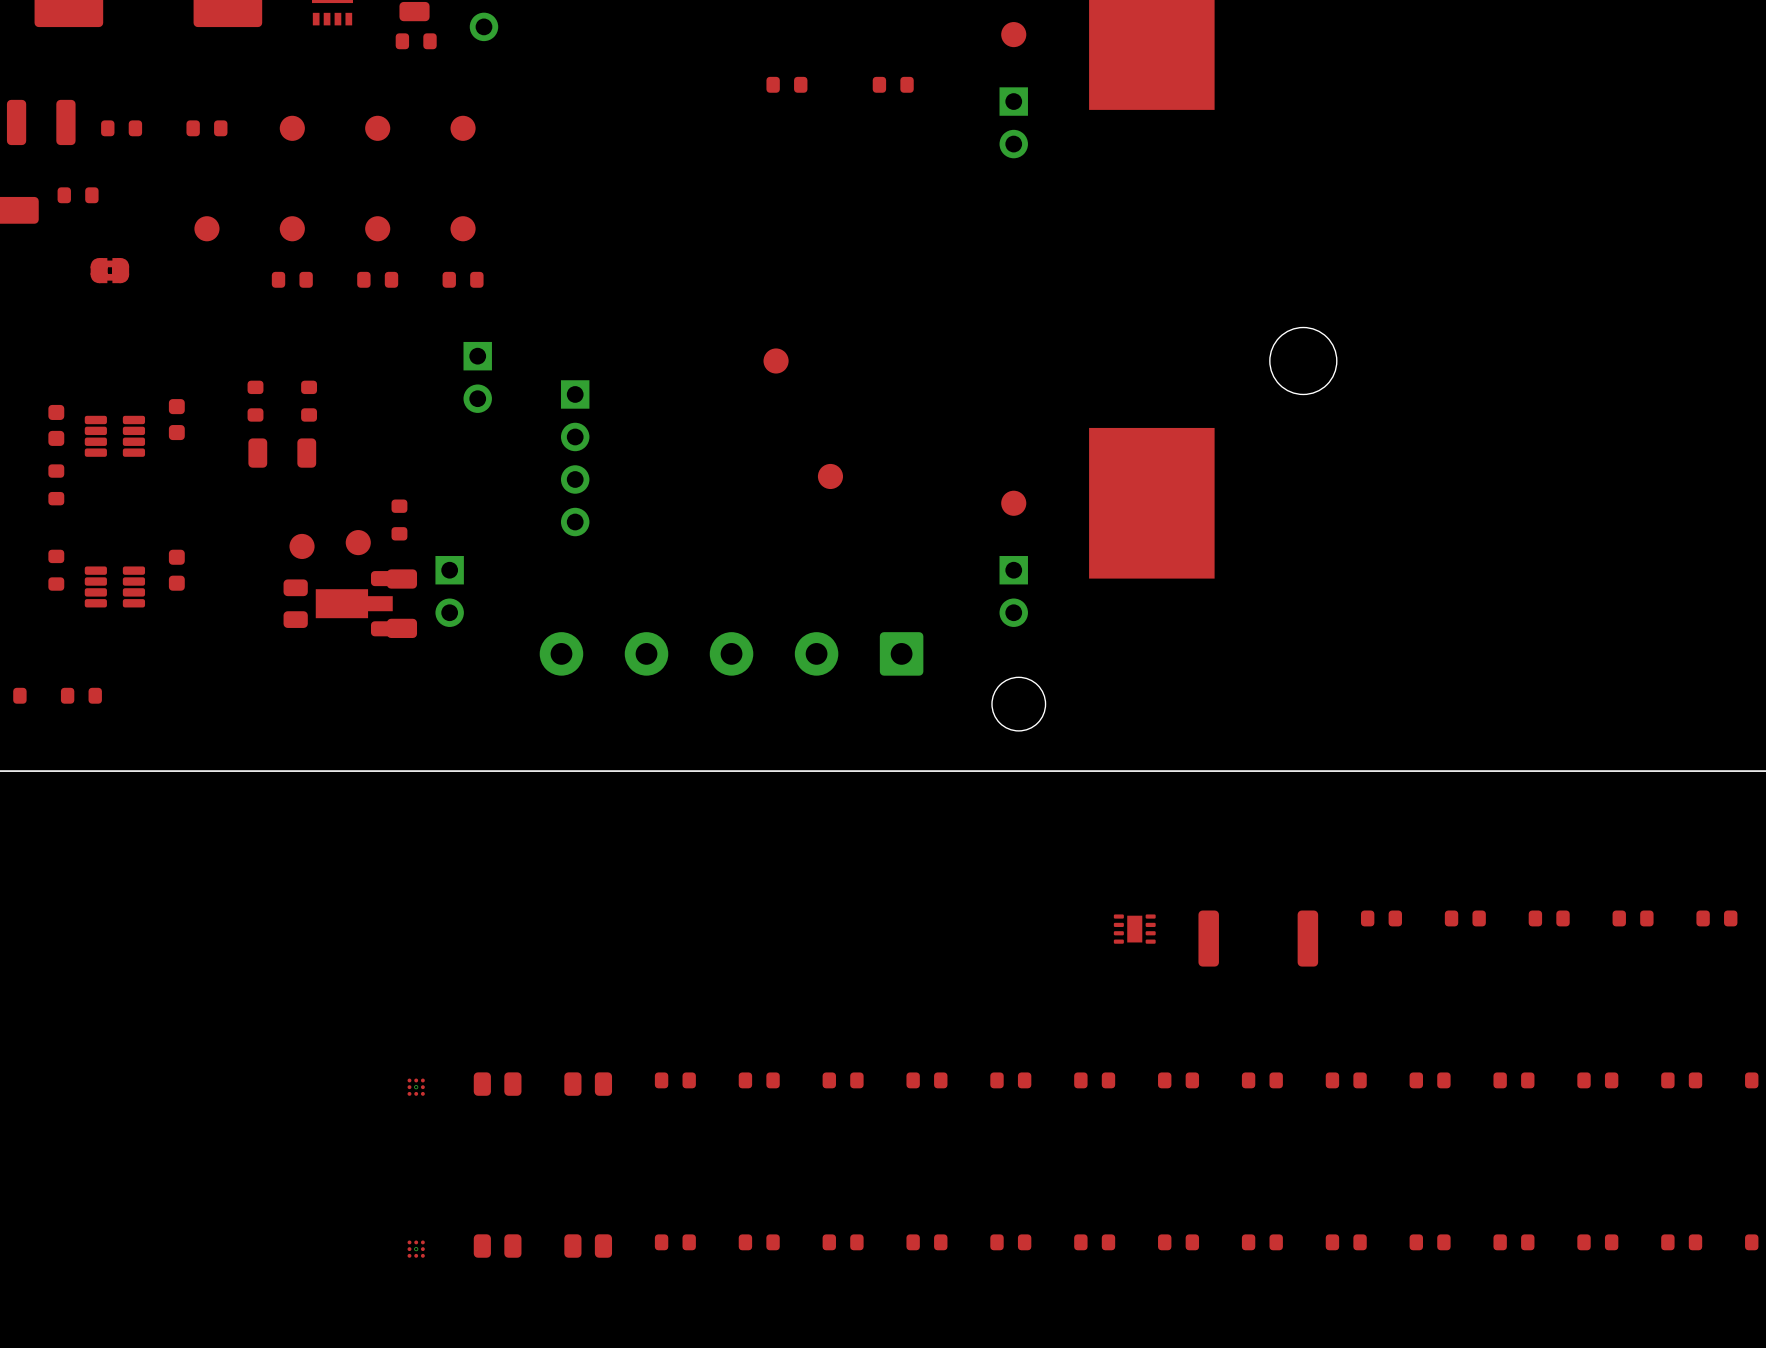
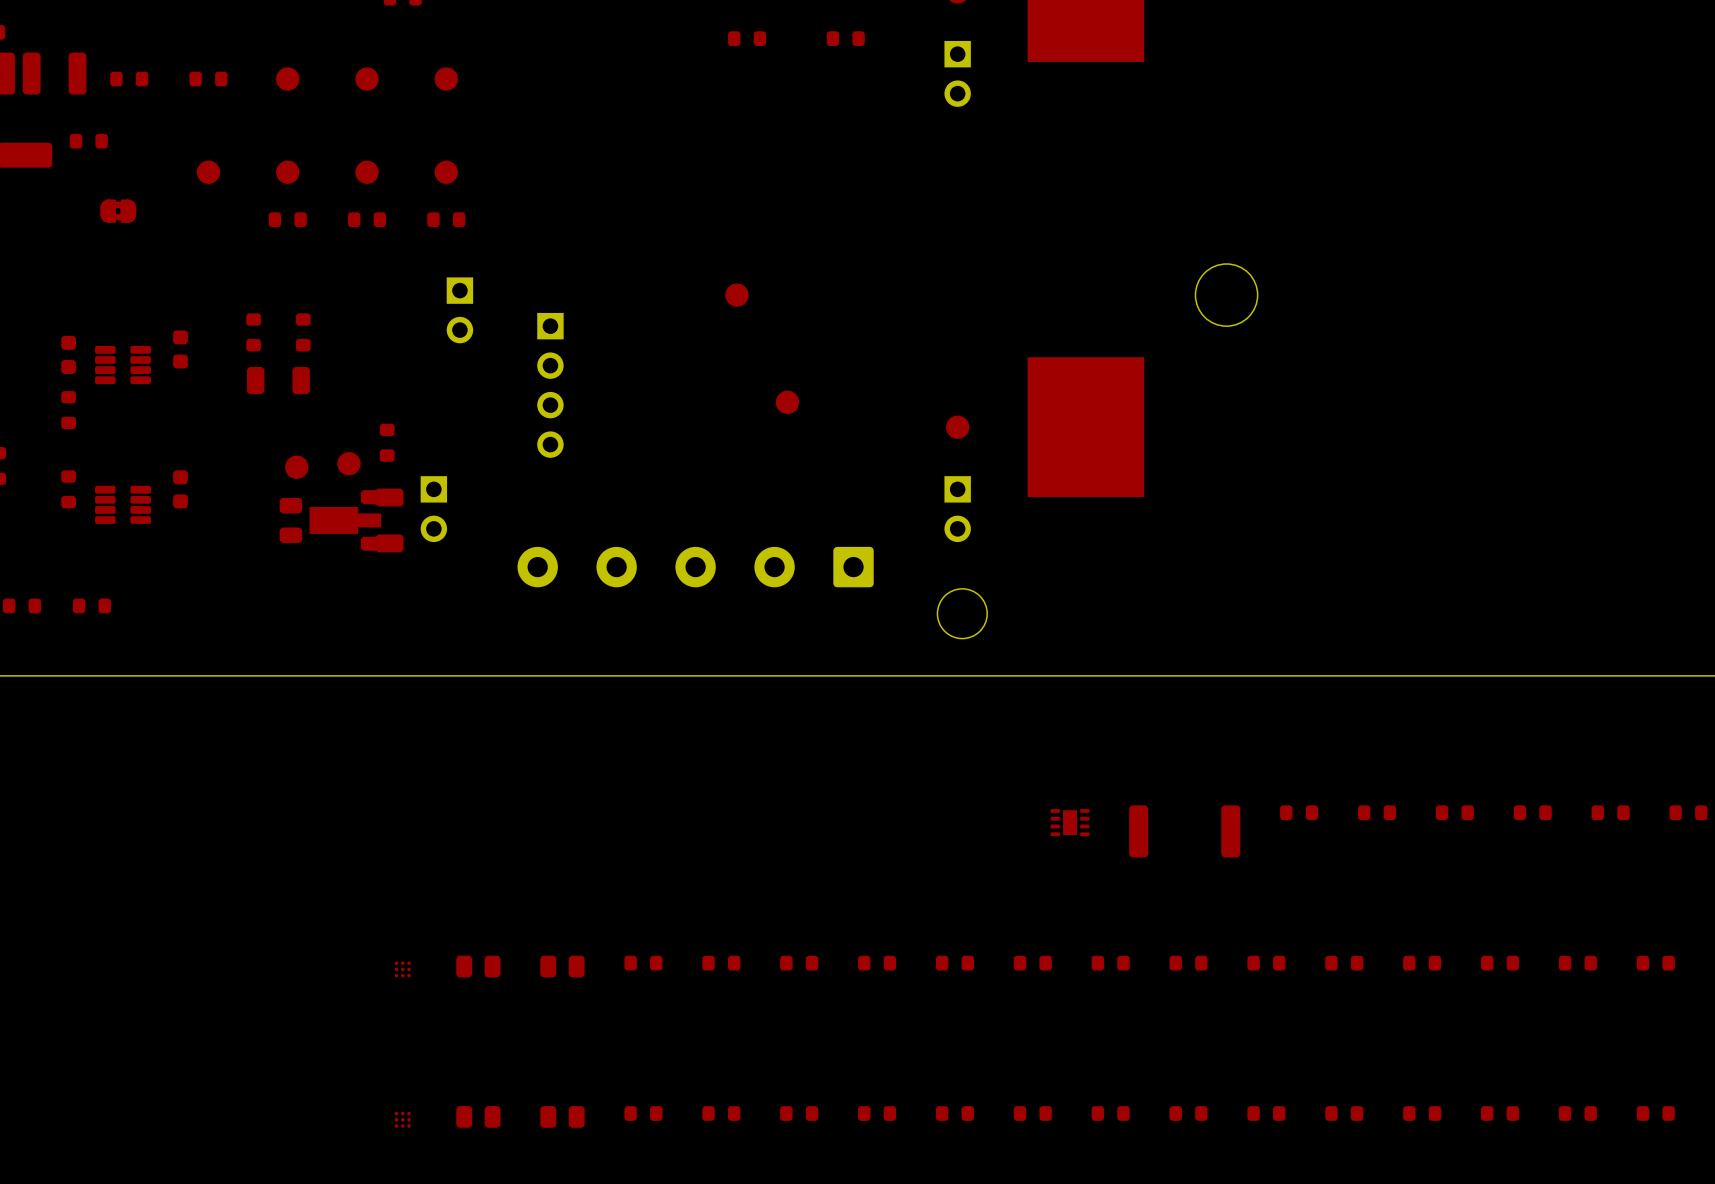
part footprint: [407, 1078, 425, 1096] -> [394, 961, 411, 978]
part footprint: [407, 1240, 425, 1258] -> [394, 1111, 411, 1128]

